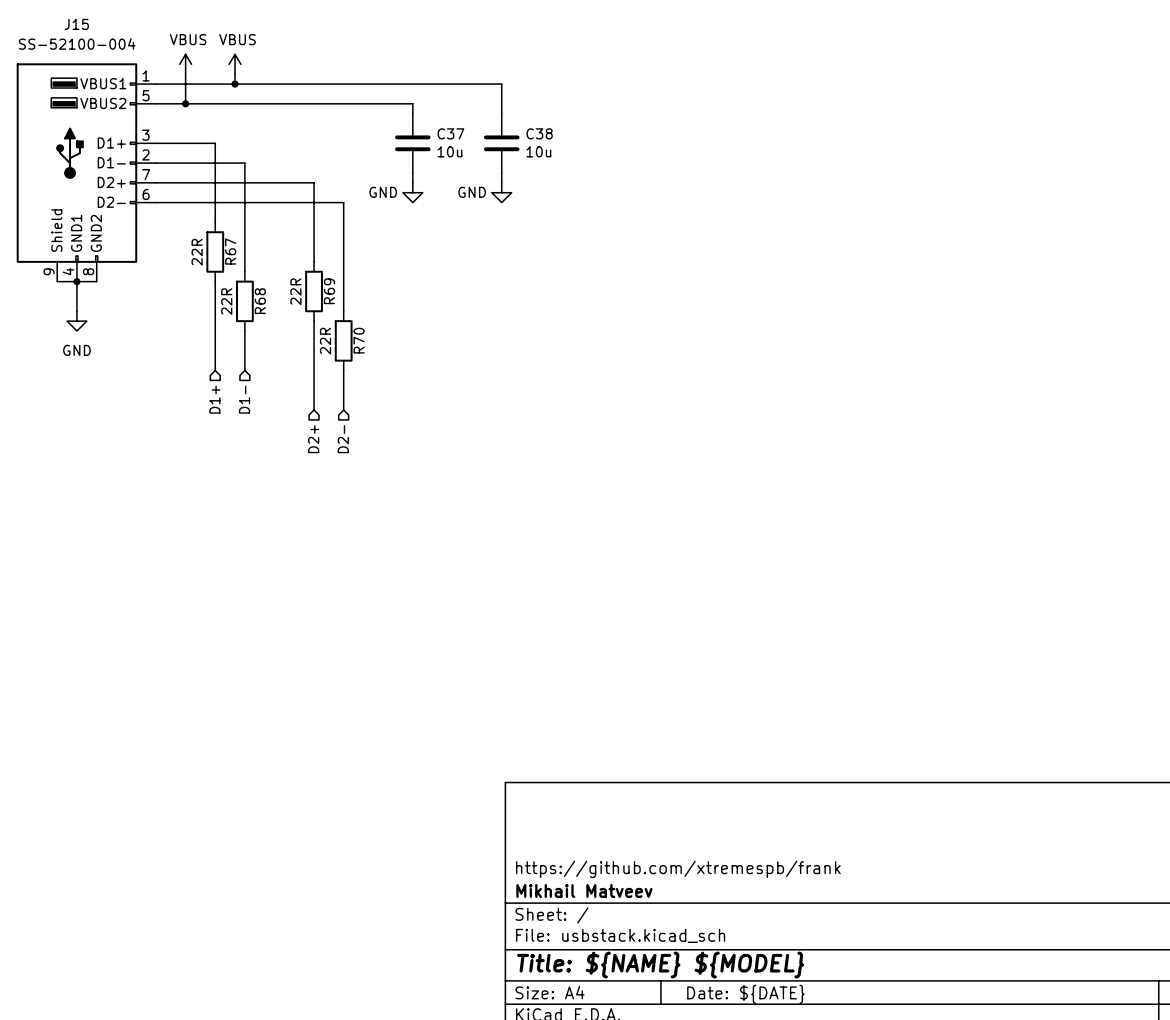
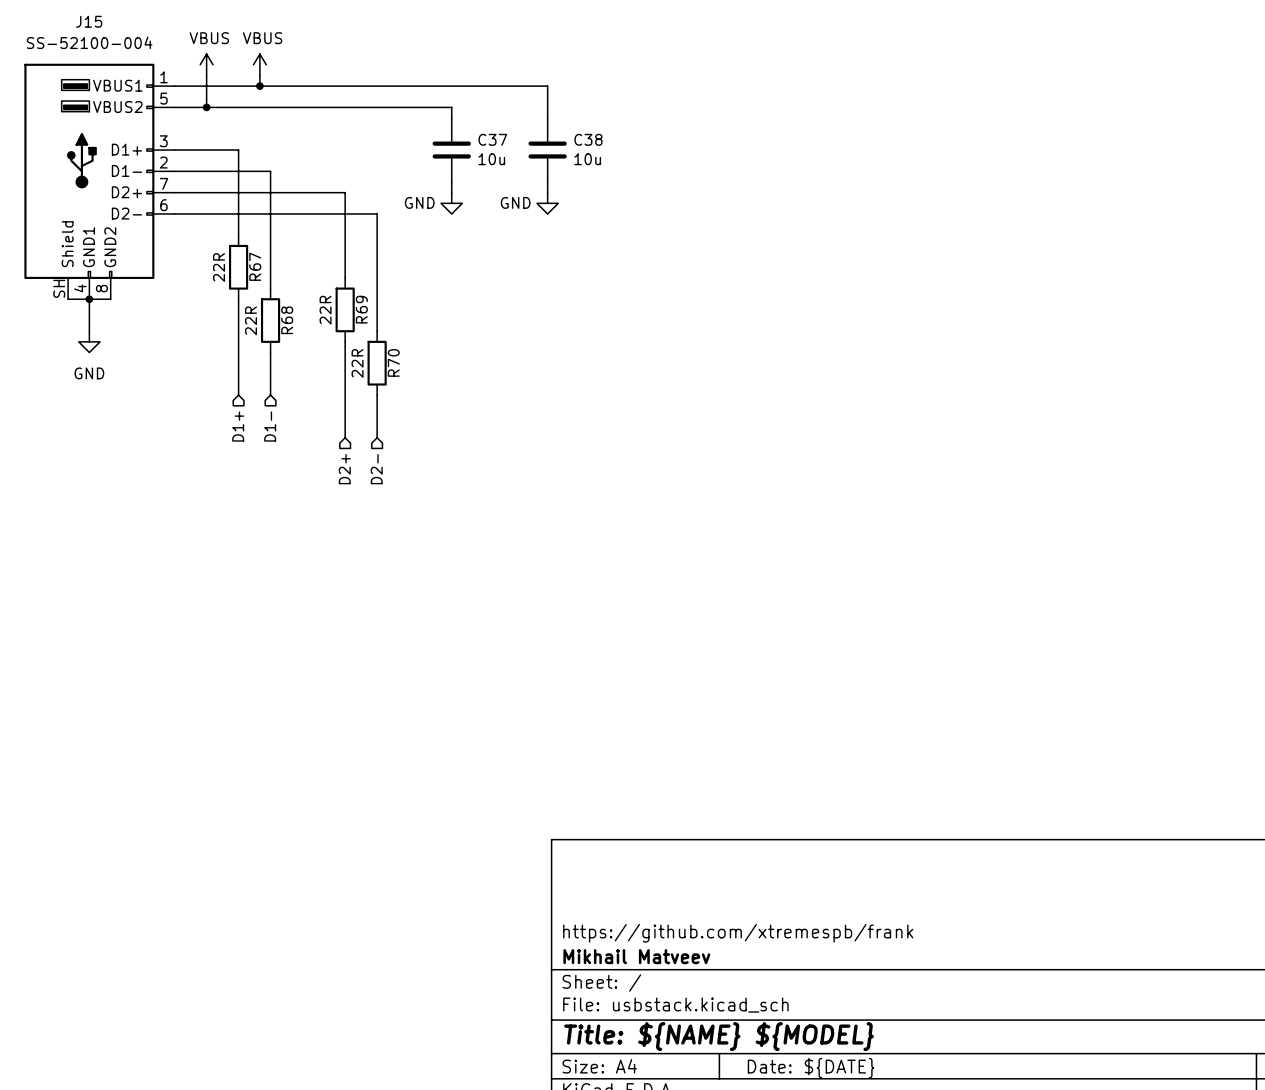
J15 pin number: 9 (49, 271) -> SH (59, 288)

